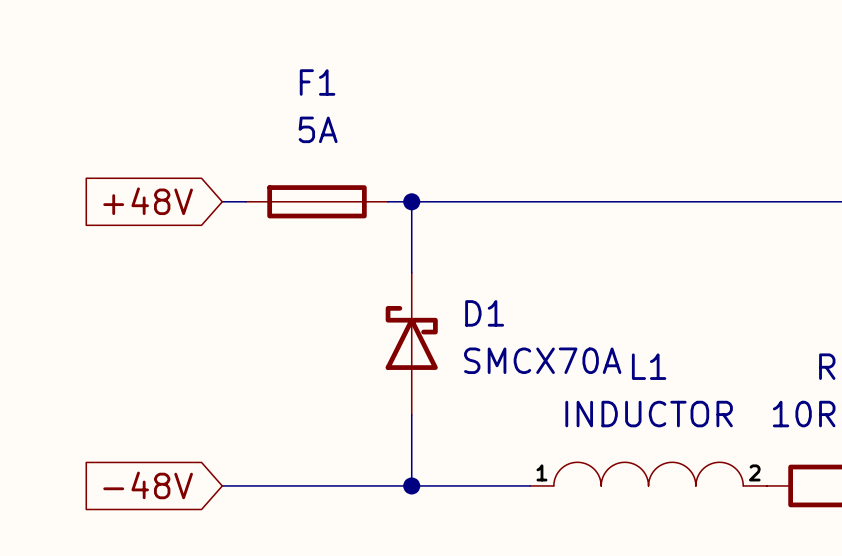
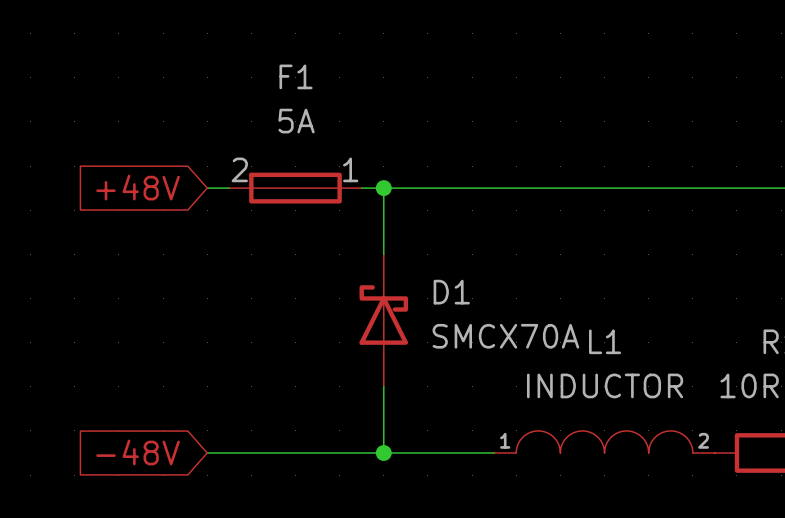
F1 pin number: none -> 2 (239, 169)
F1 pin number: none -> 1 (350, 169)

